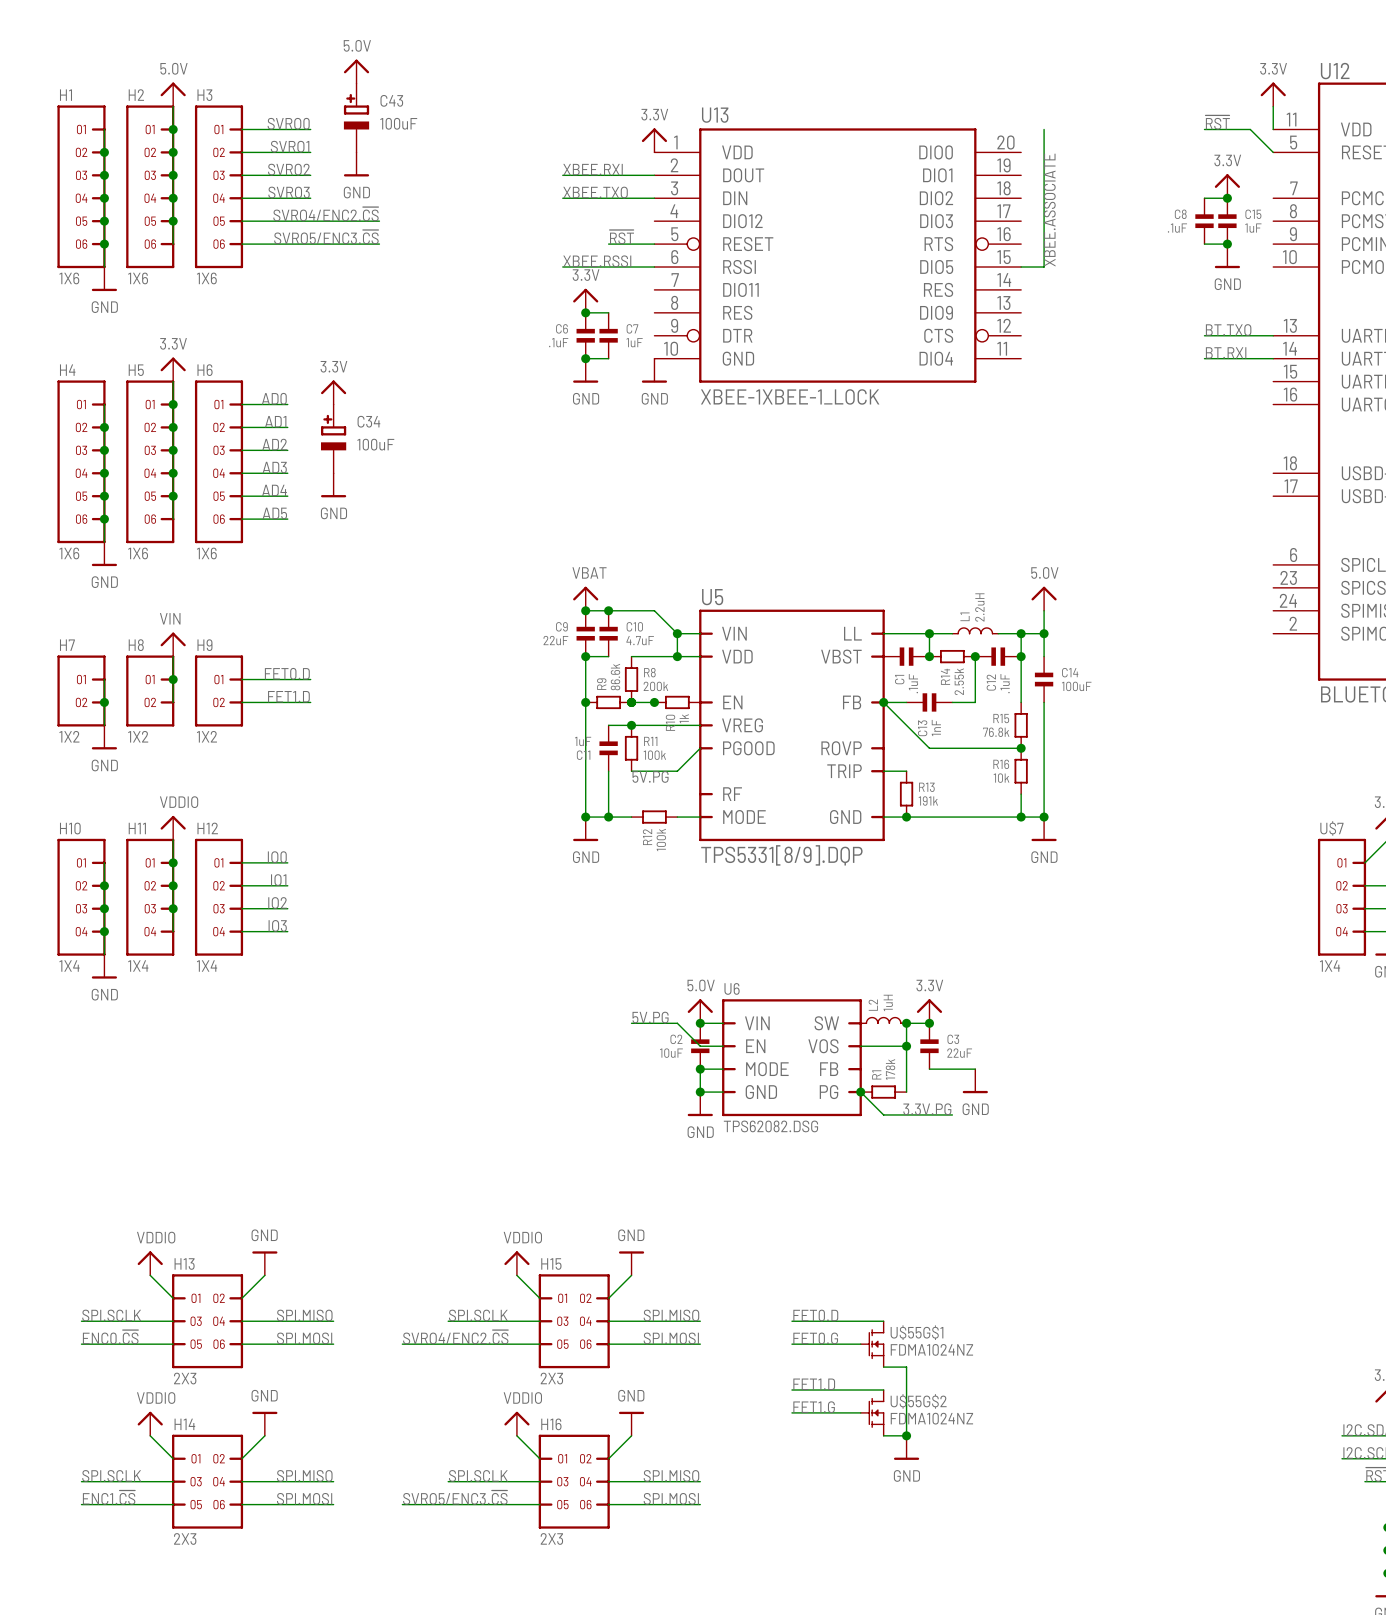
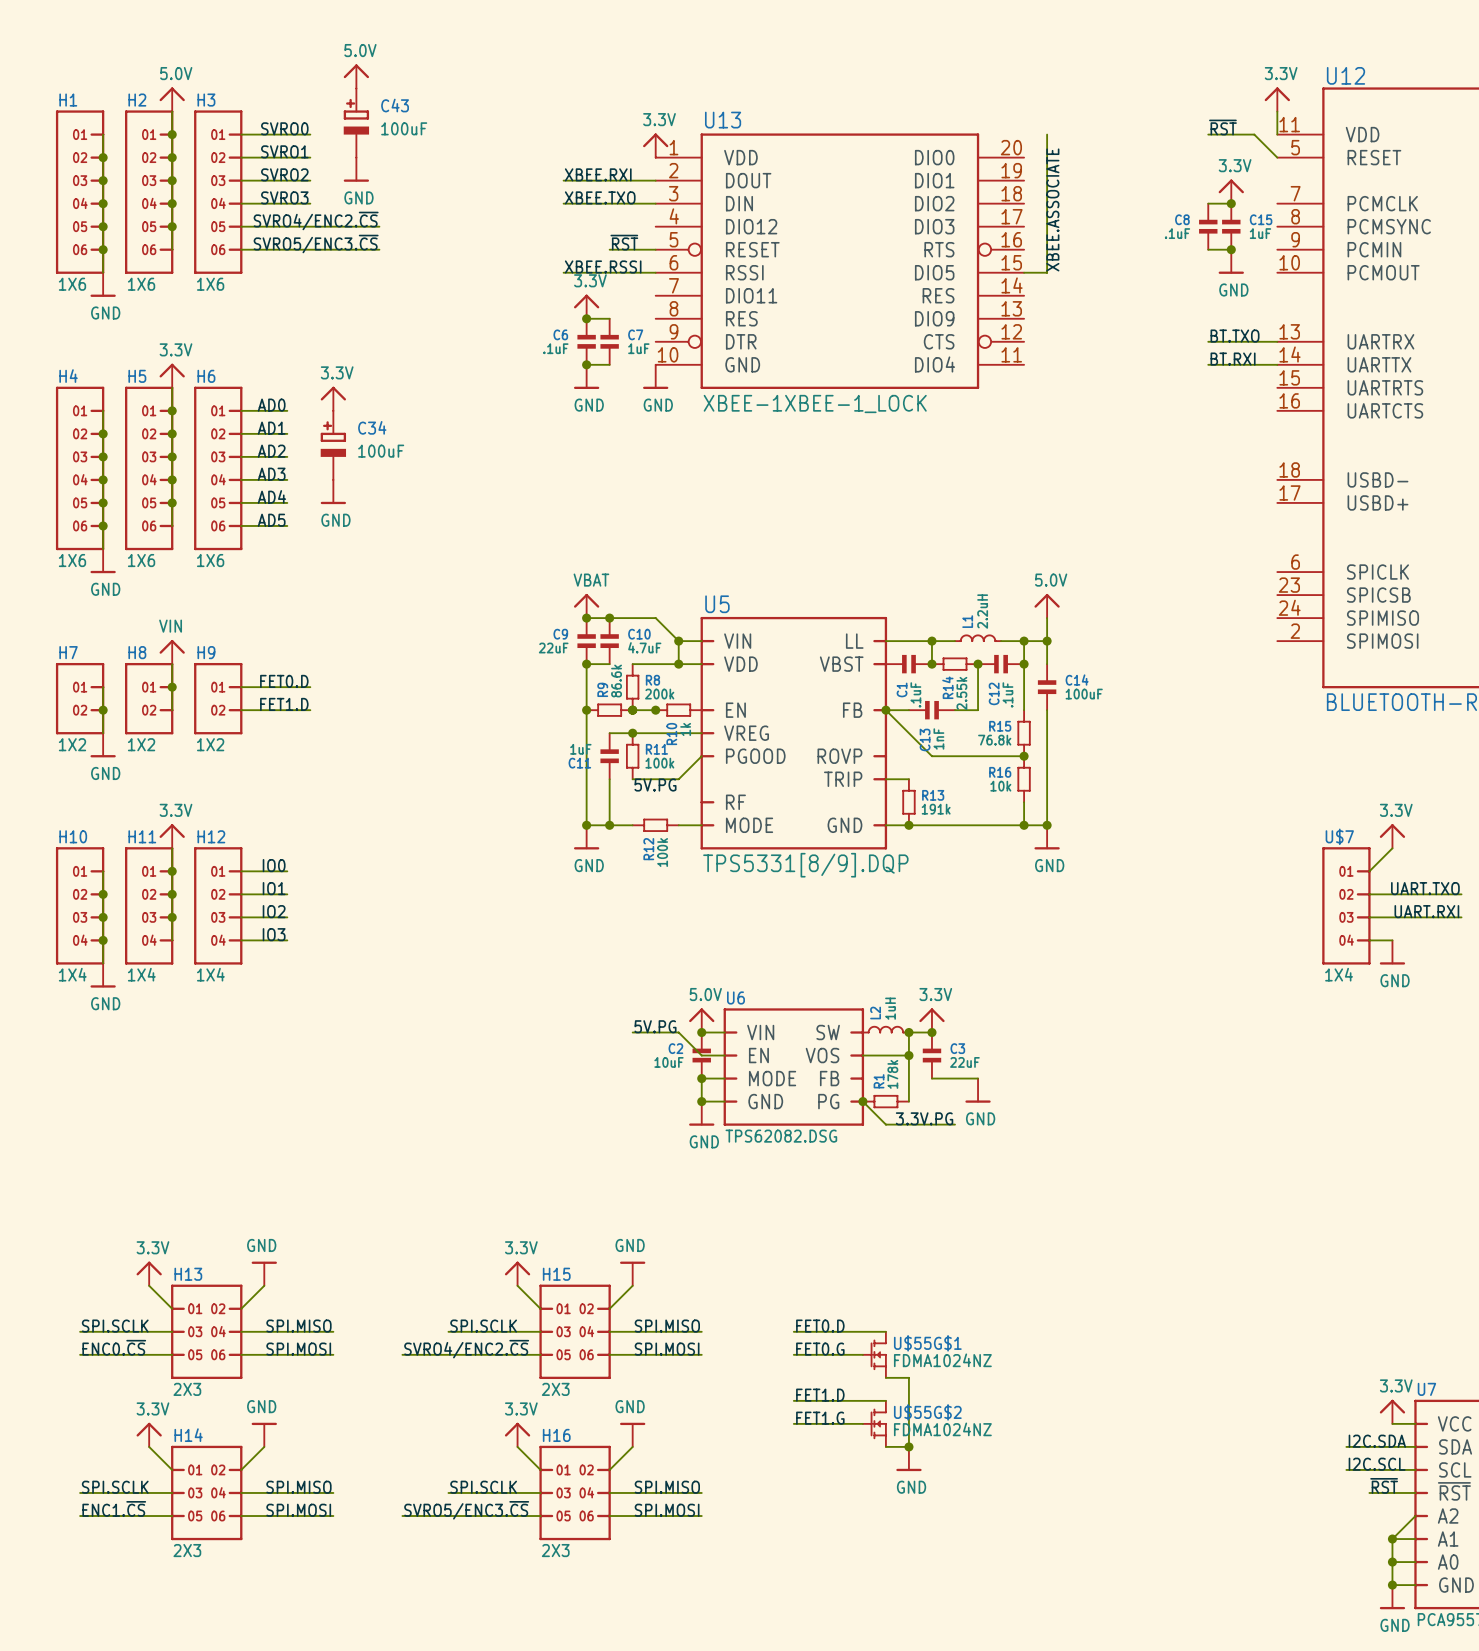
power symbol: VDDIO (173, 827) -> 3.3V (172, 836)
power symbol: VDDIO (150, 1263) -> 3.3V (149, 1273)
power symbol: VDDIO (516, 1263) -> 3.3V (517, 1273)
power symbol: VDDIO (150, 1423) -> 3.3V (149, 1434)
power symbol: VDDIO (516, 1423) -> 3.3V (517, 1434)

